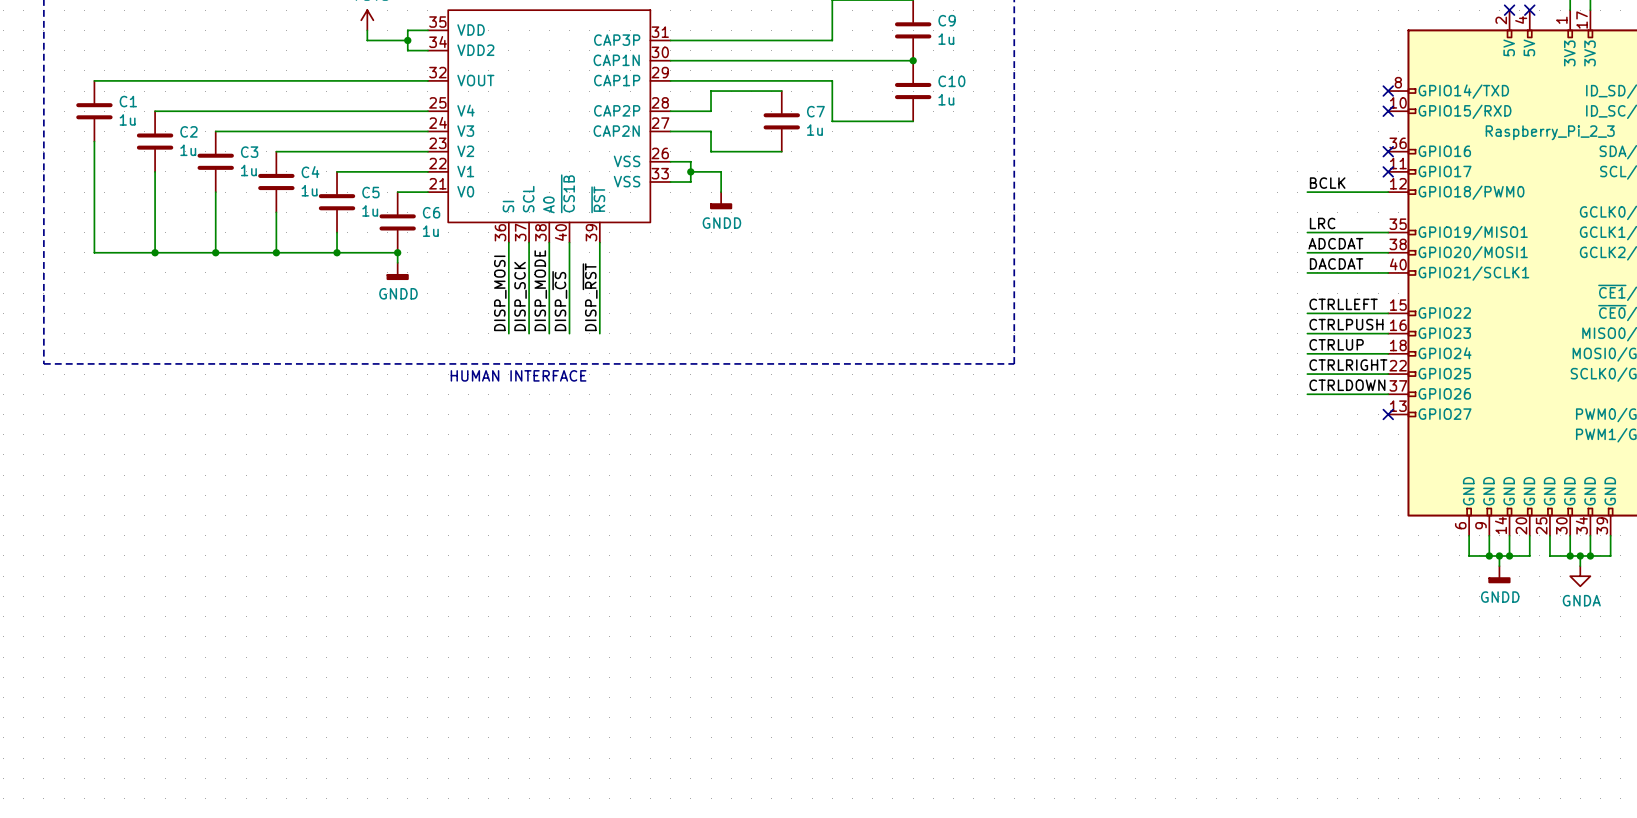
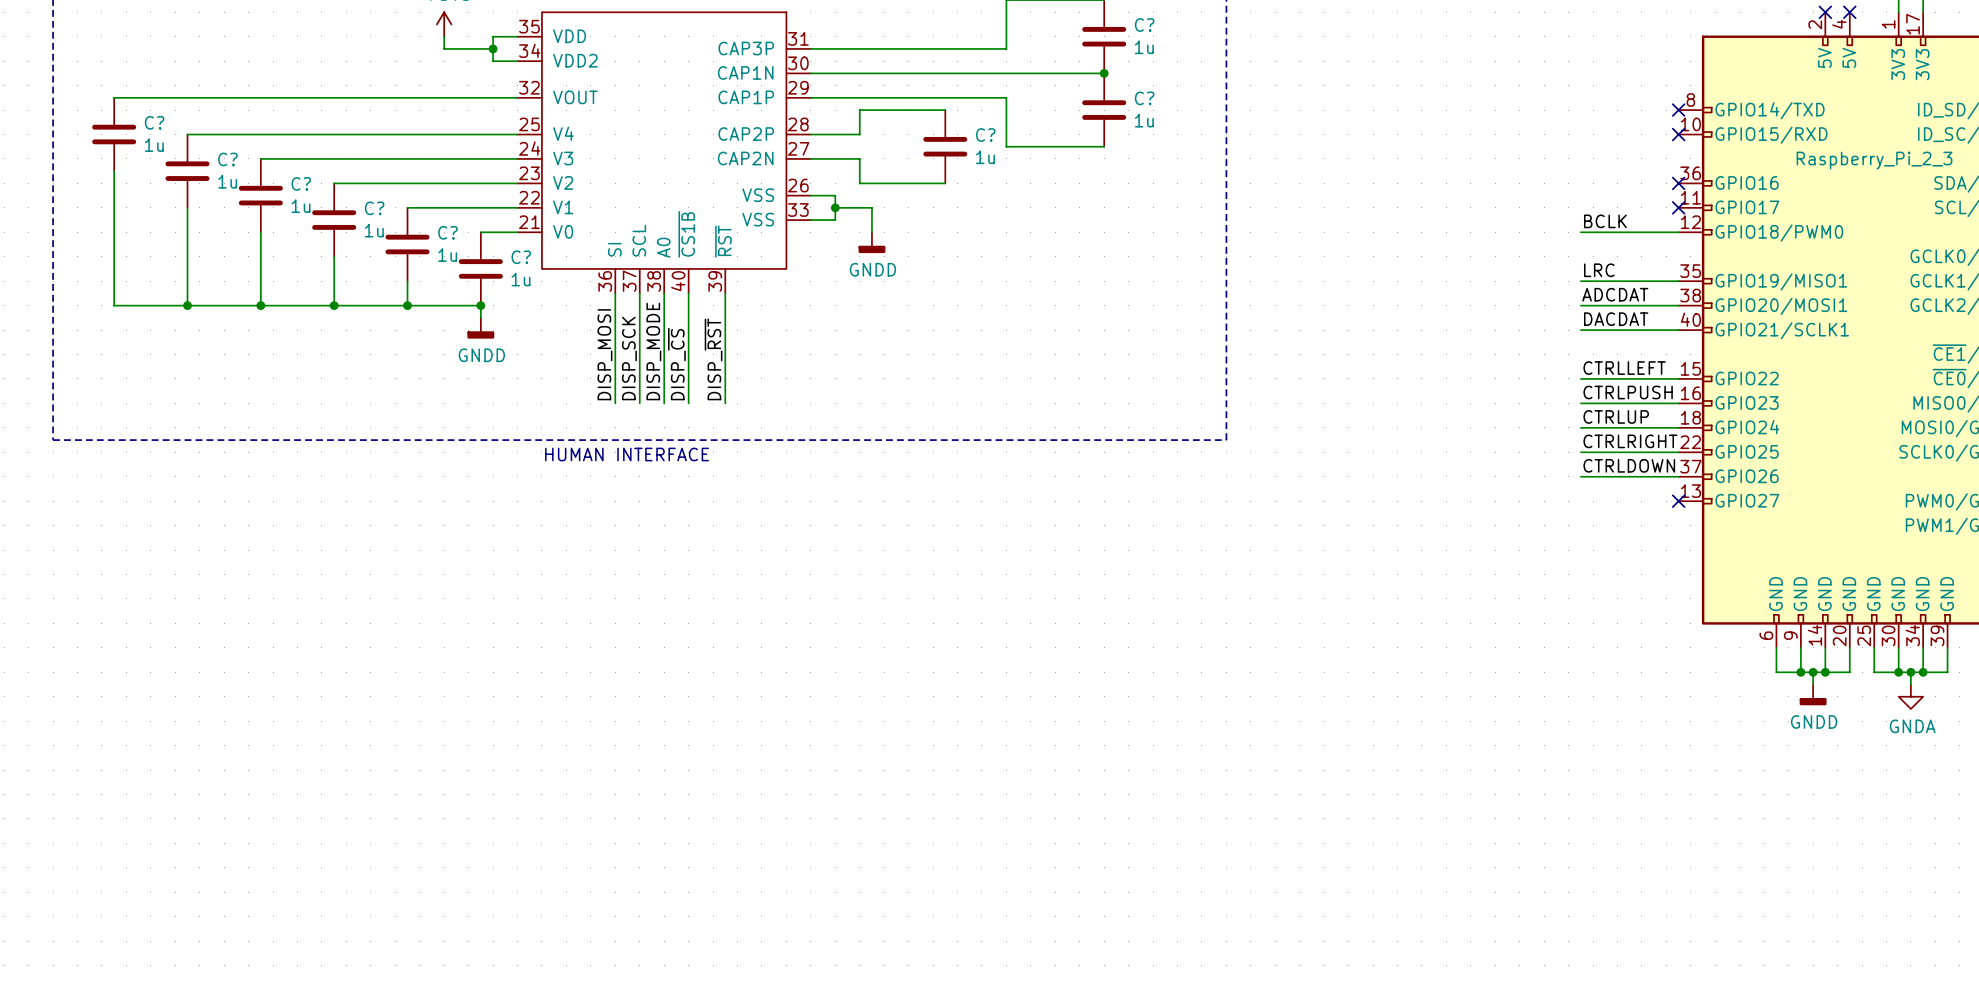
C9 name: C9 (947, 20) -> C? (1144, 25)
C10 name: C10 (951, 81) -> C? (1144, 98)
C1 name: C1 (128, 101) -> C? (154, 122)
C7 name: C7 (815, 111) -> C? (985, 135)
C2 name: C2 (188, 131) -> C? (227, 159)
C3 name: C3 (249, 152) -> C? (301, 183)
C4 name: C4 (310, 172) -> C? (374, 208)
C5 name: C5 (370, 192) -> C? (447, 232)
C6 name: C6 (431, 212) -> C? (521, 257)

